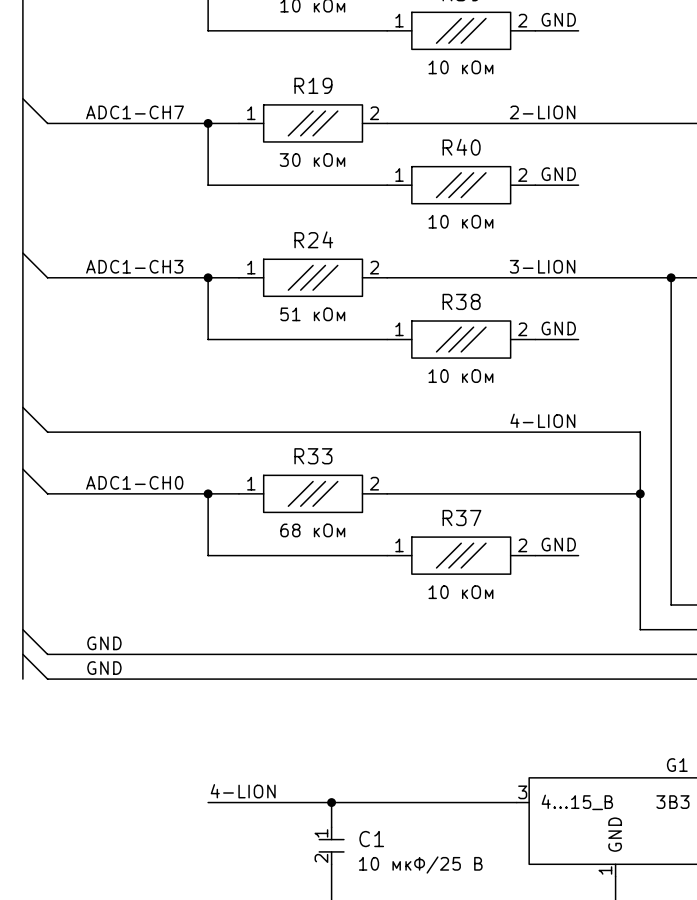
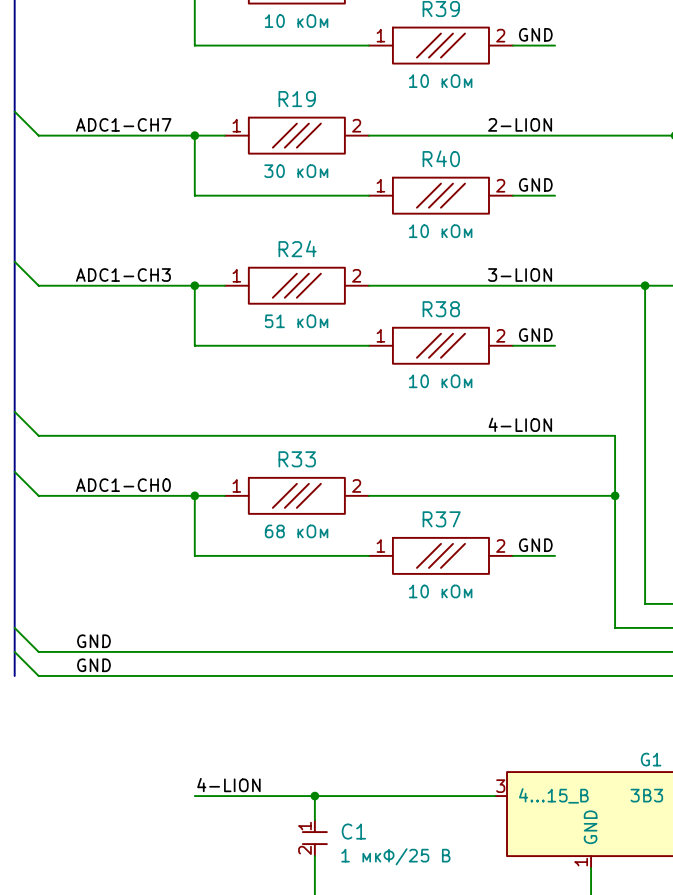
C1 text: 10 мкФ/25 В (420, 865) -> 1 мкФ/25 В (395, 856)

